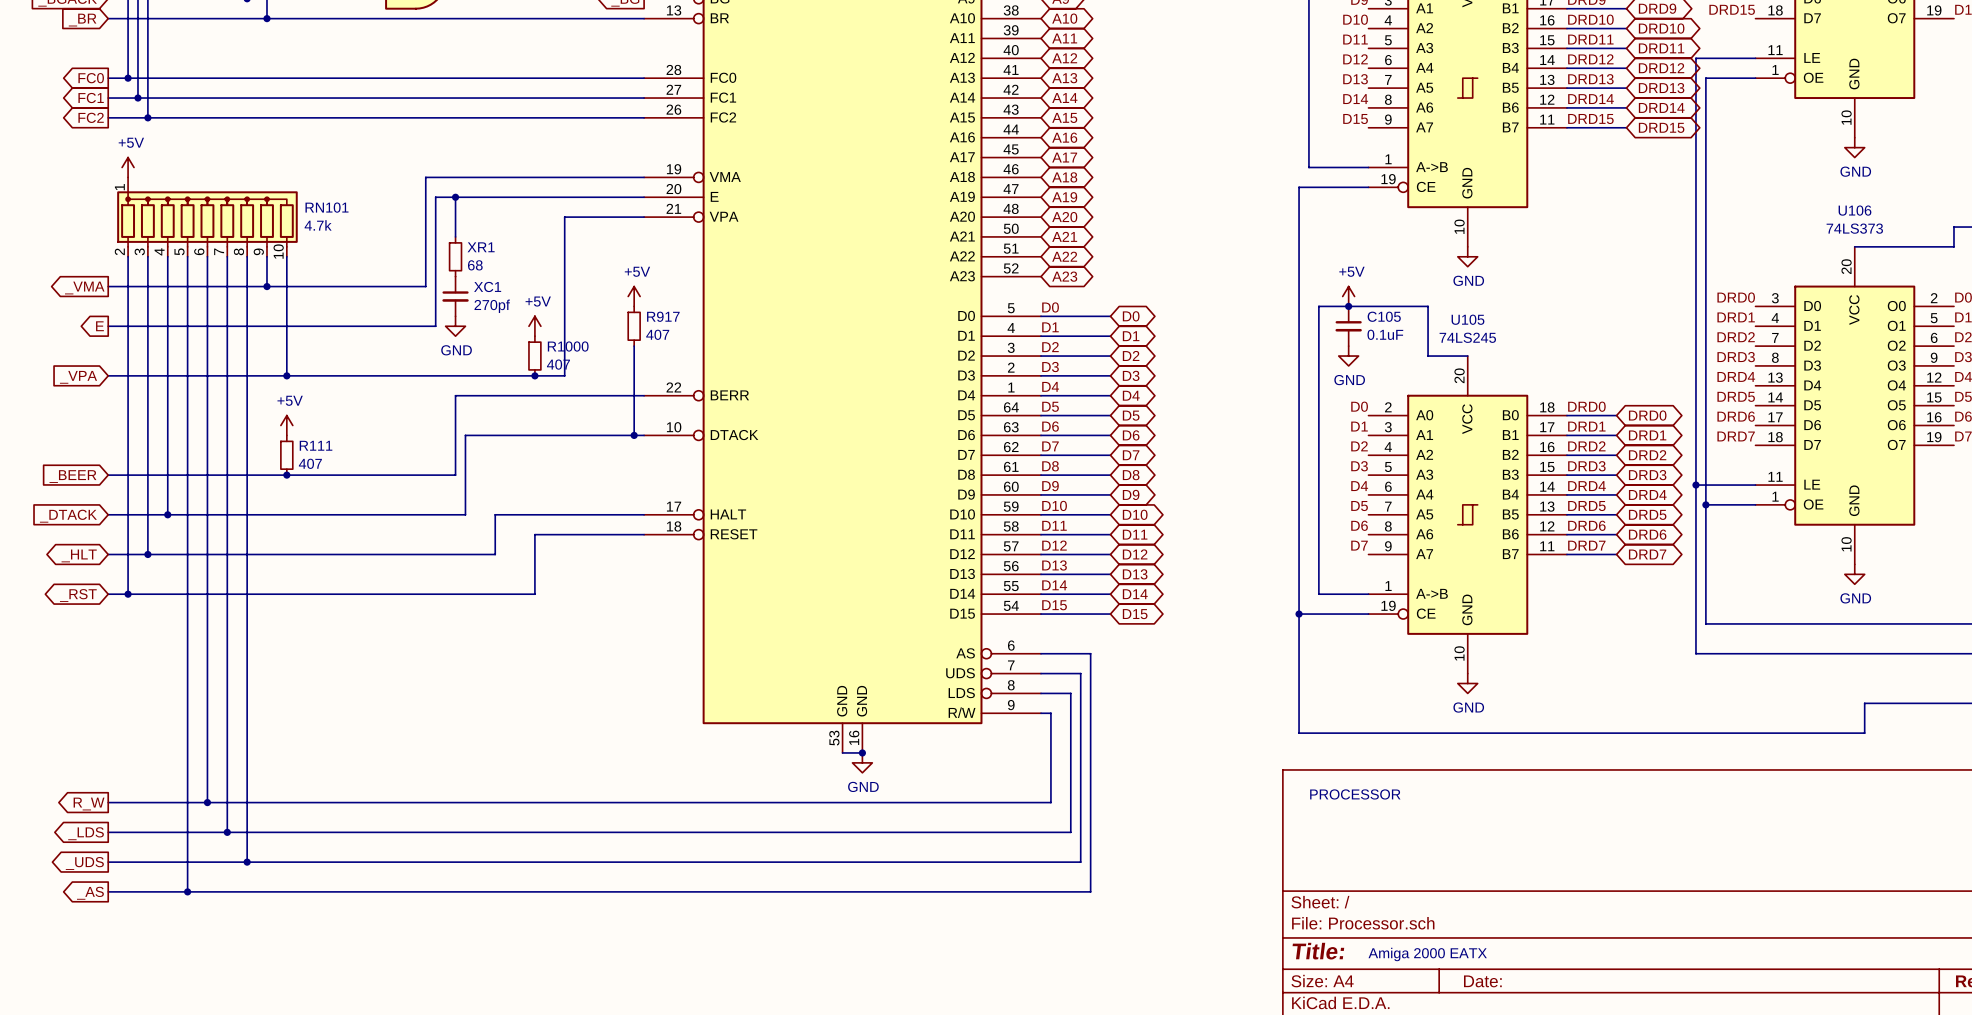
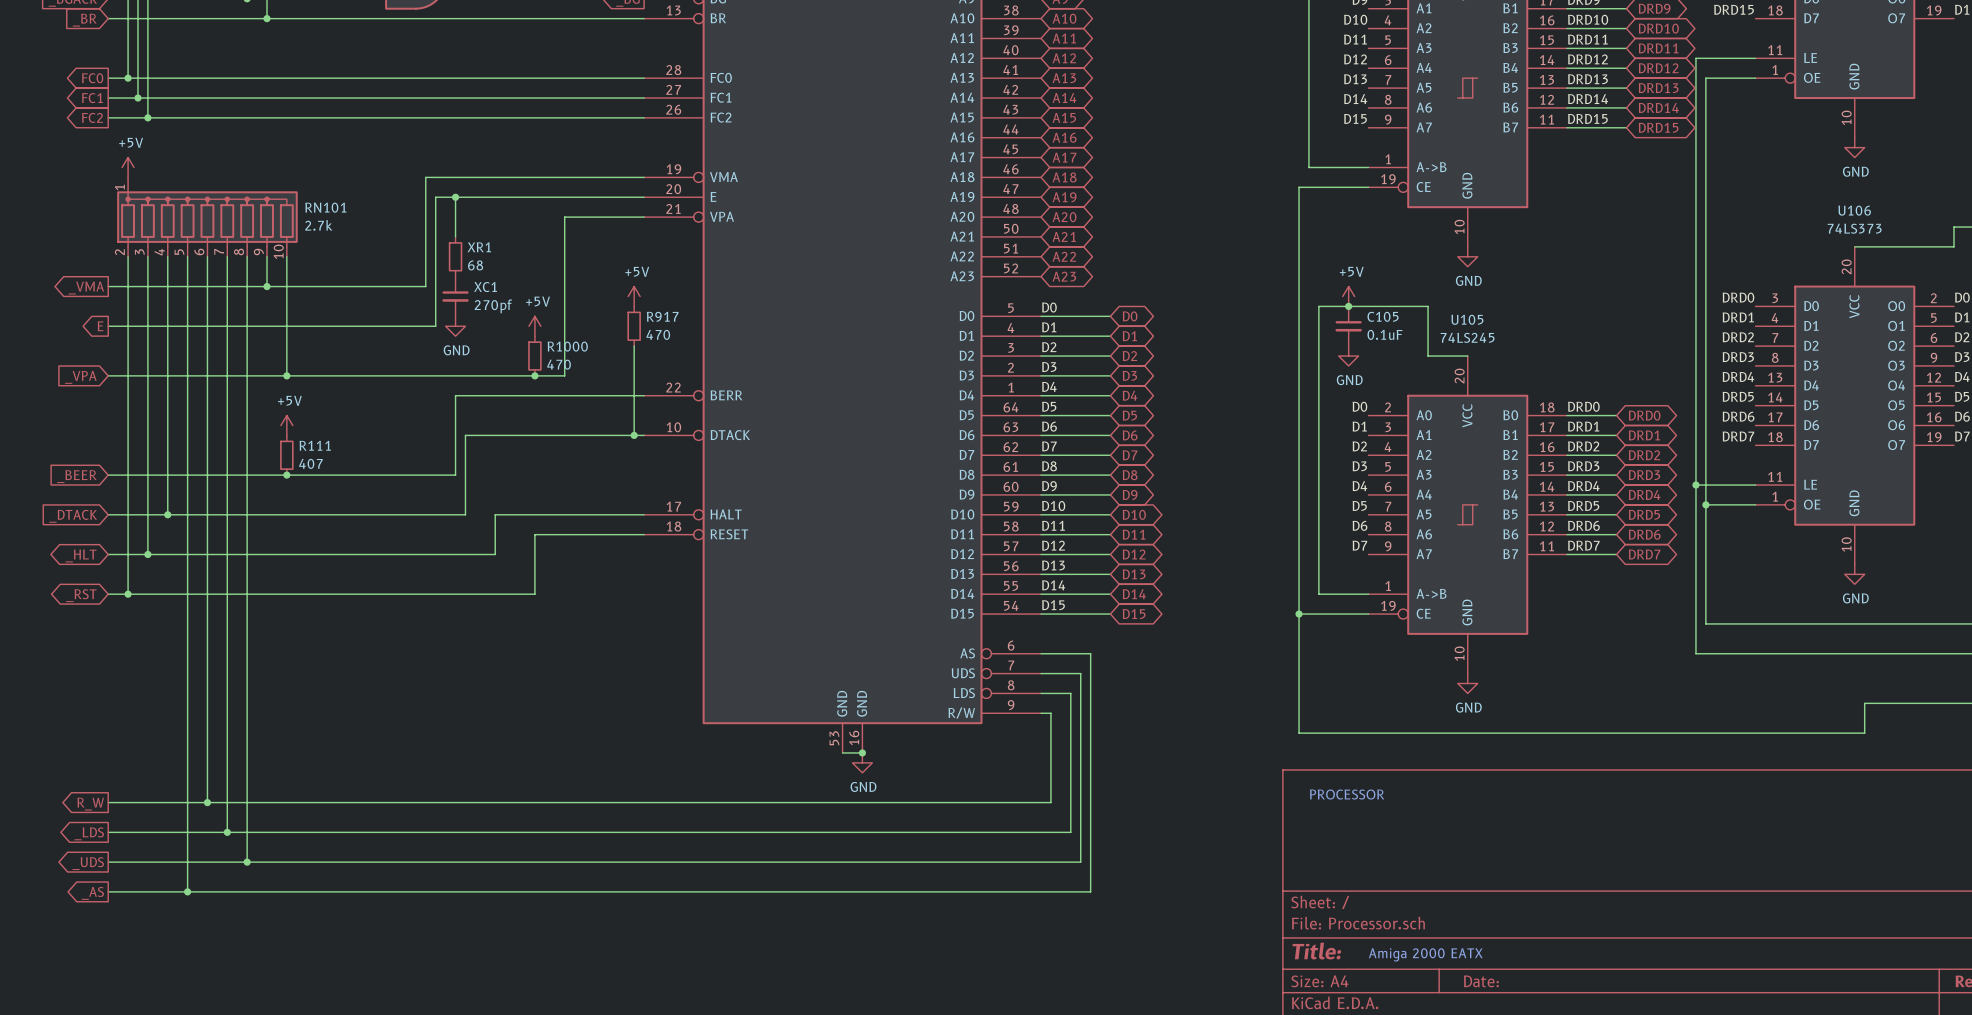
RN101 value: 4.7k (318, 225) -> 2.7k (318, 225)
R917 value: 407 (657, 334) -> 470 (658, 334)
R1000 value: 407 (558, 364) -> 470 (559, 364)

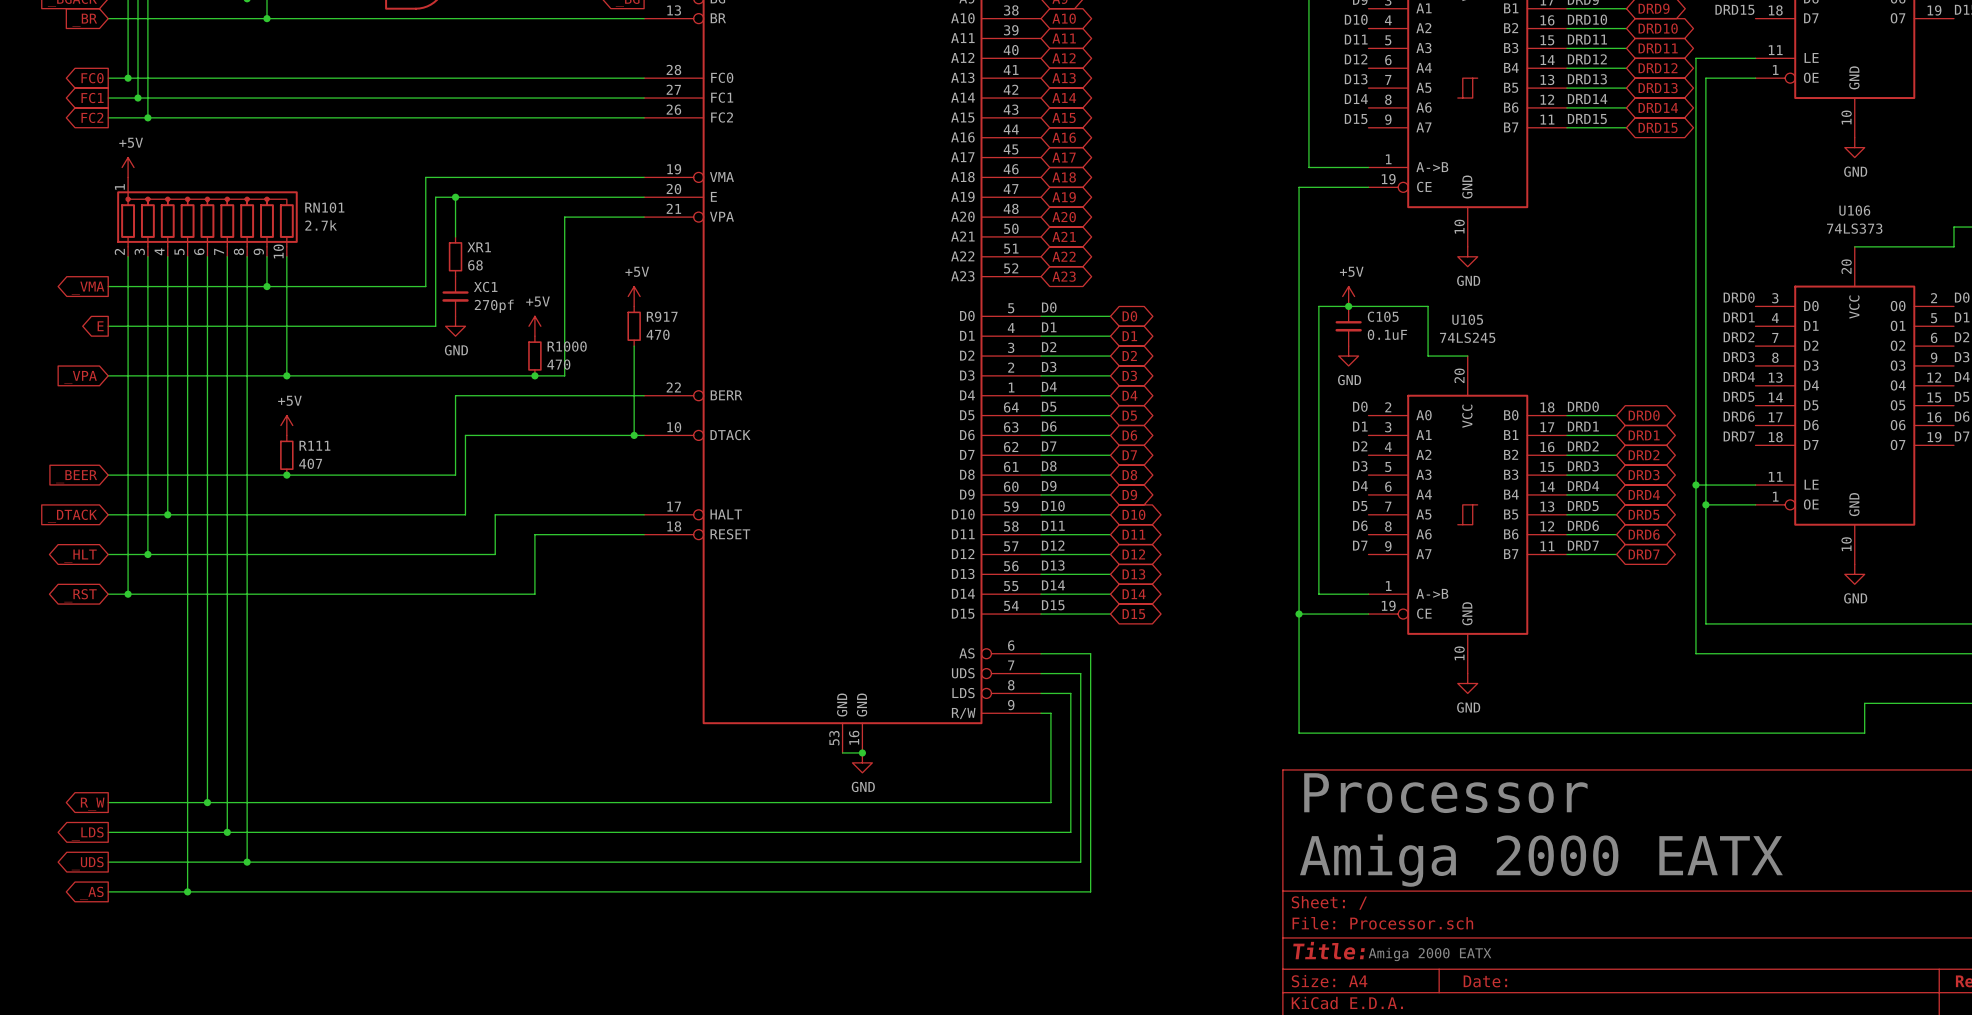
text: none -> Processor (1445, 793)
text: PROCESSOR (1347, 794) -> none
text: none -> Amiga 2000 EATX (1541, 860)

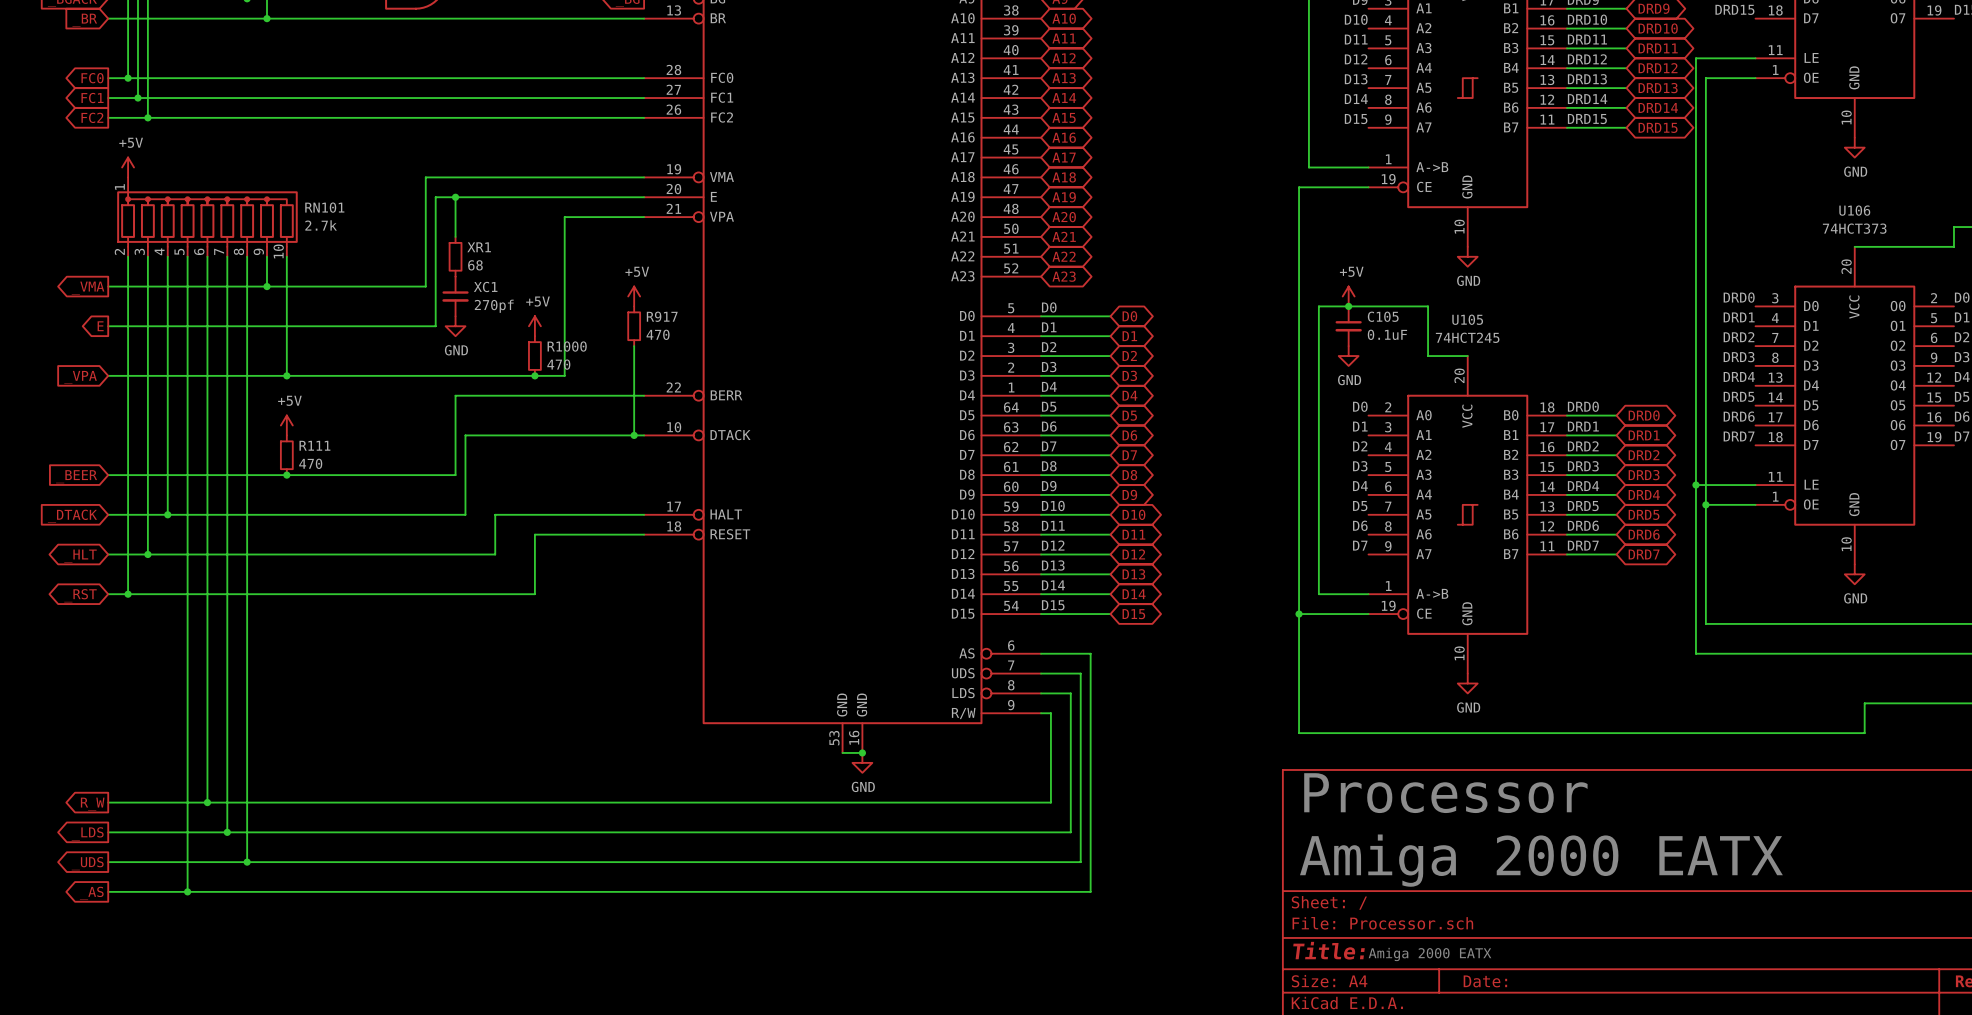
U106 value: 74LS373 (1854, 228) -> 74HCT373 (1854, 228)
U105 value: 74LS245 (1467, 337) -> 74HCT245 (1467, 337)
R111 value: 407 (310, 463) -> 470 (310, 463)

